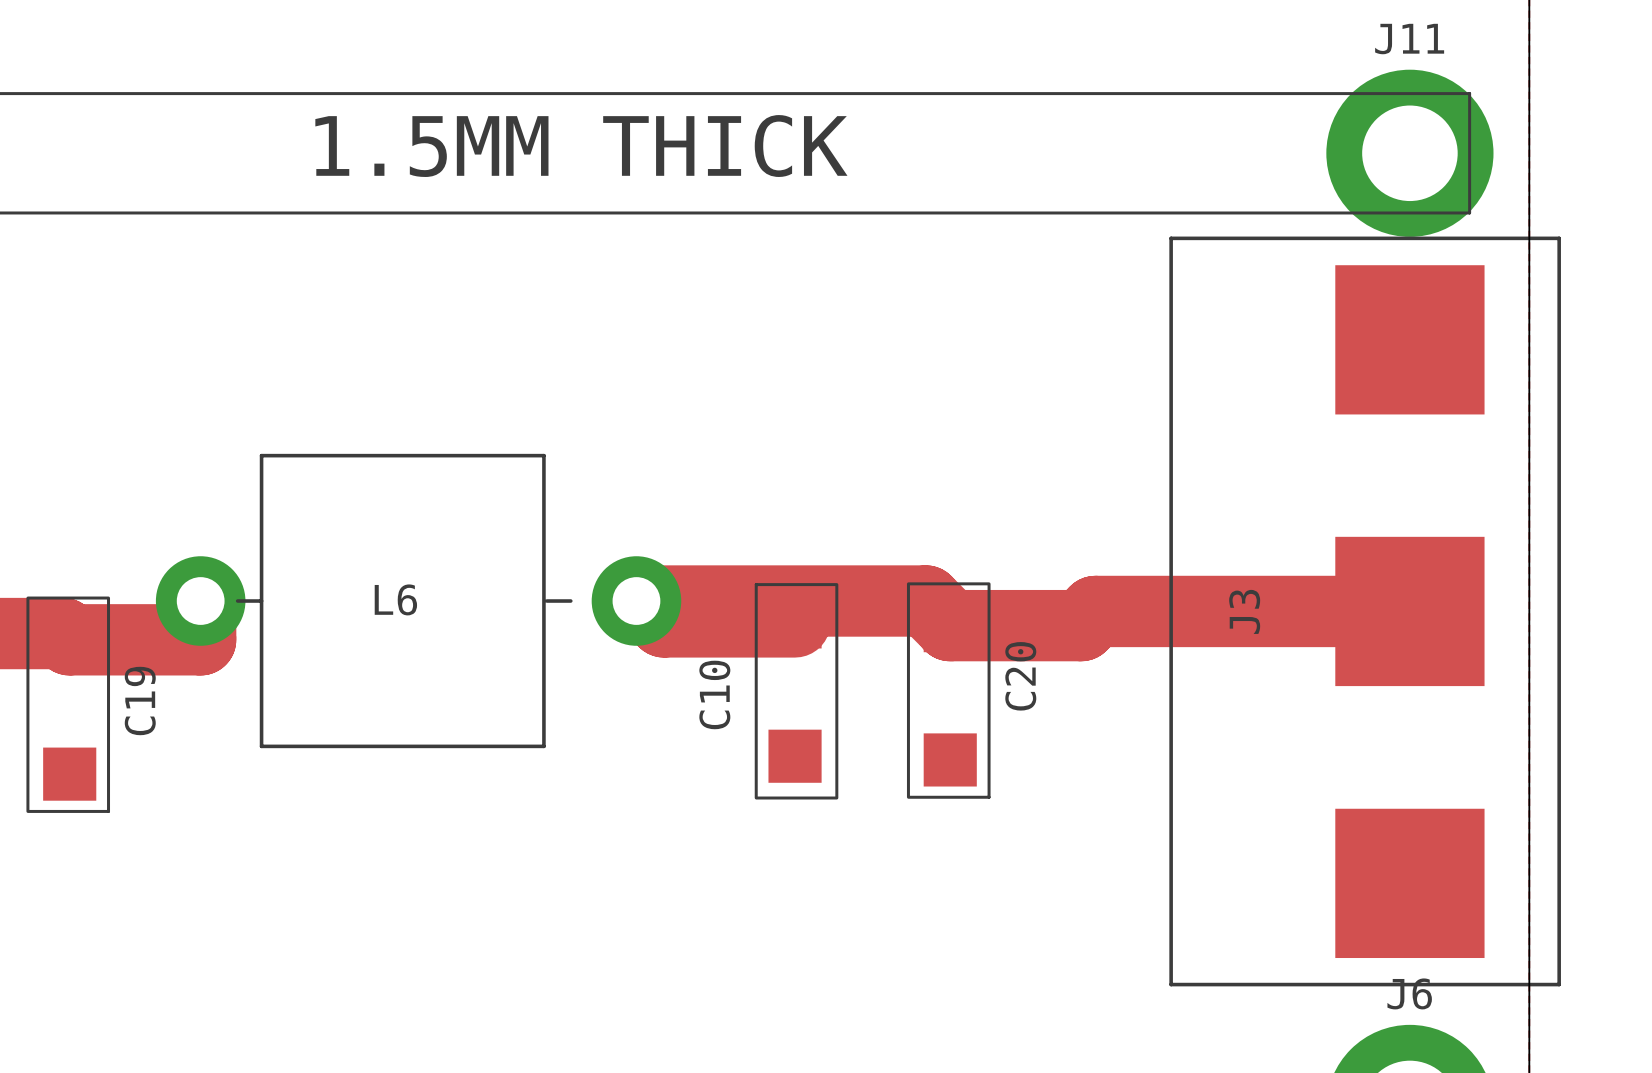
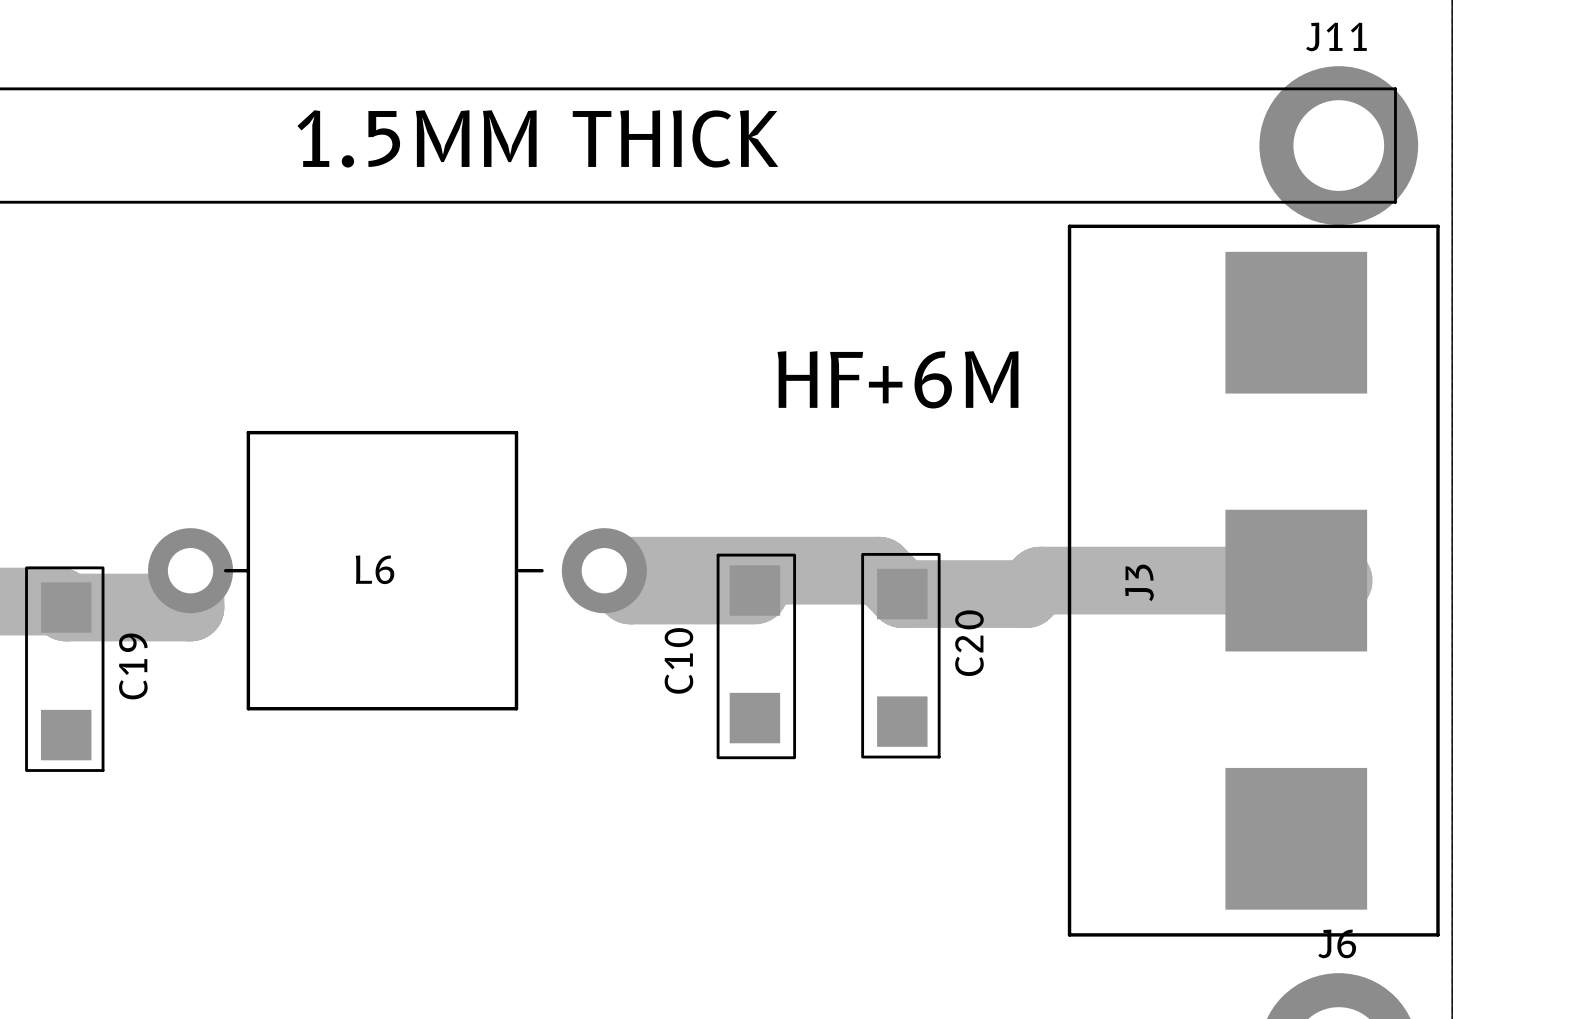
text: none -> HF+6M (898, 379)
J3 position: (1365, 611) -> (1253, 580)

